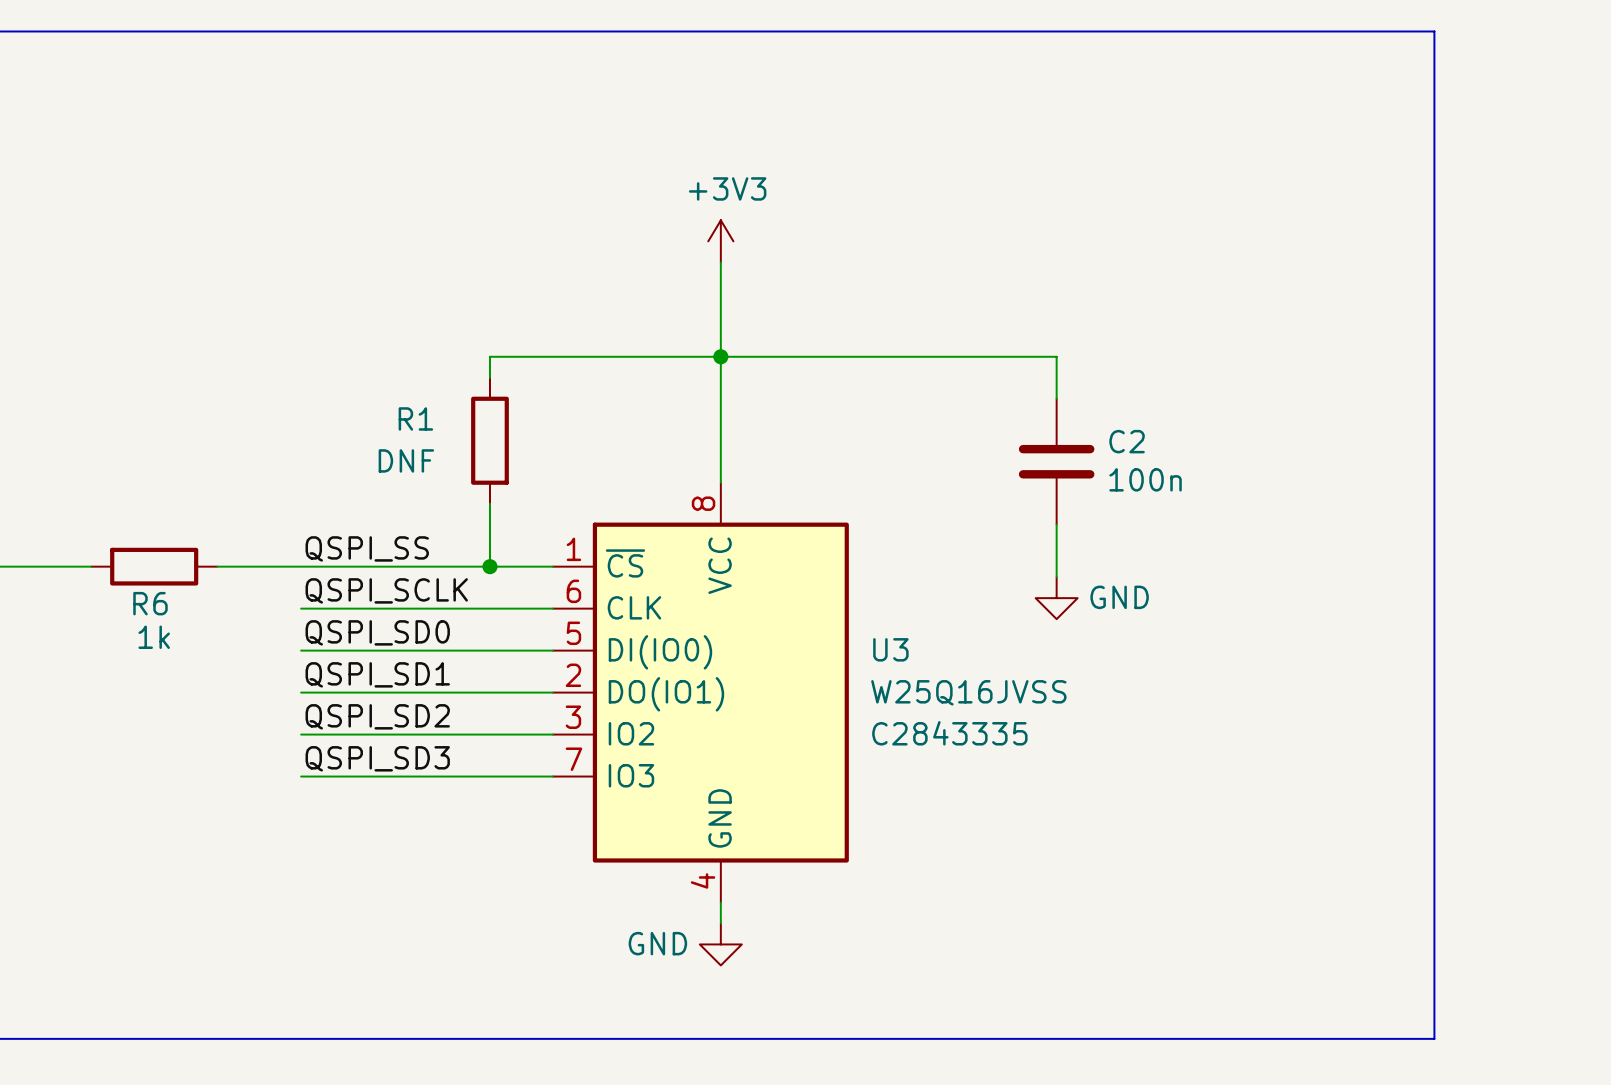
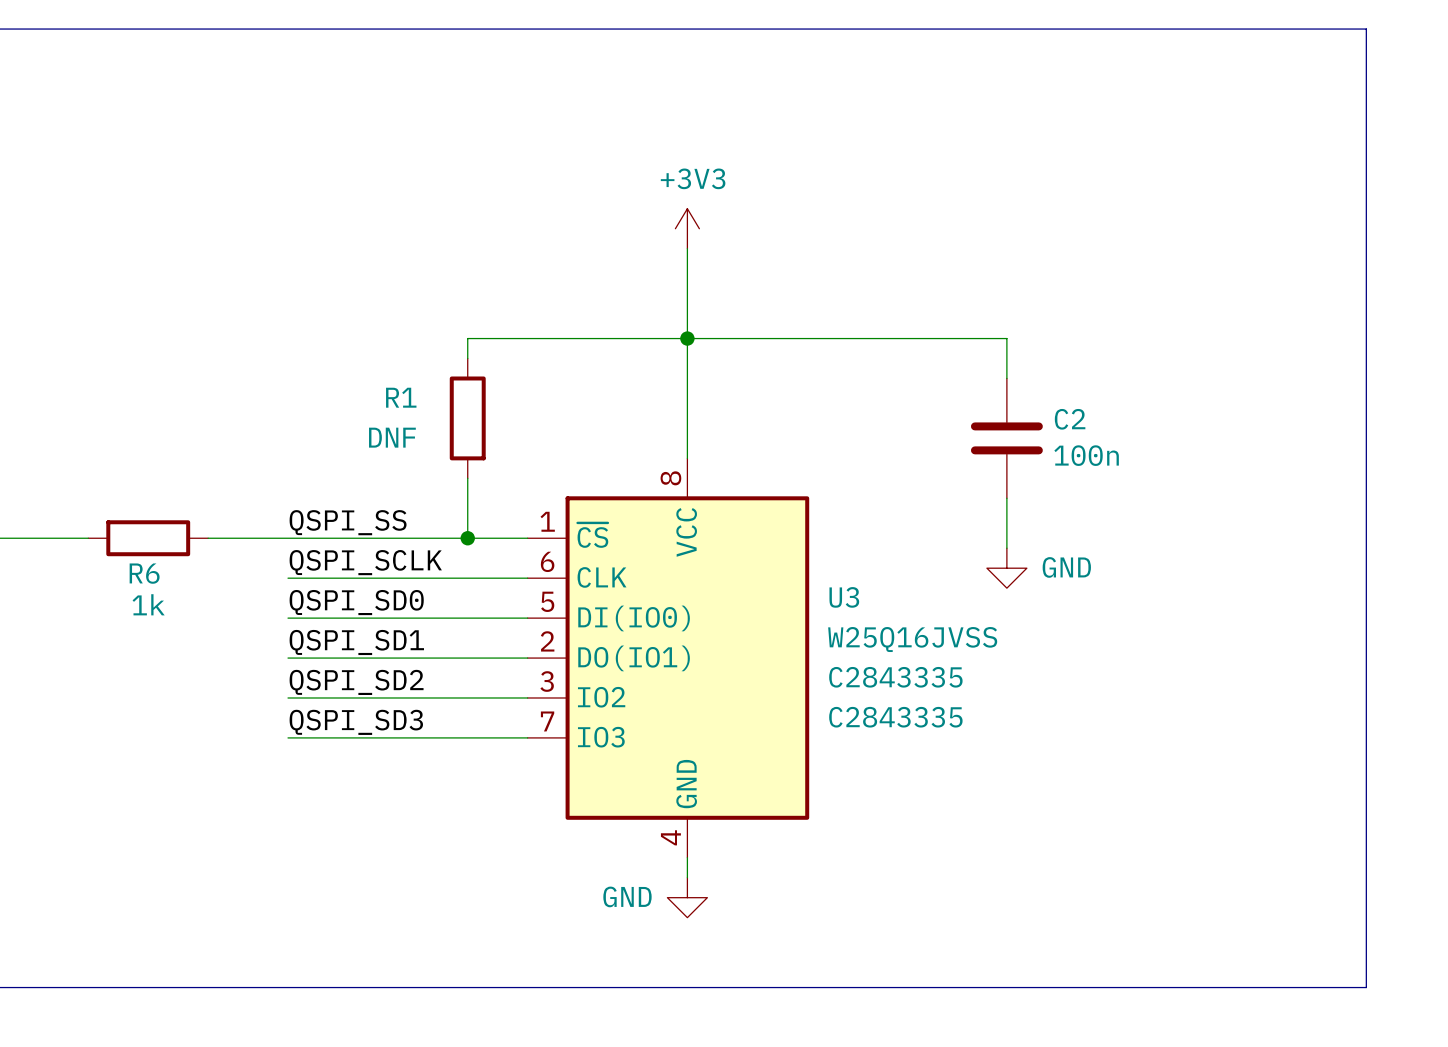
U3 name position: U3 (890, 649) -> U3 (844, 597)
U3 value position: W25Q16JVSS (968, 692) -> W25Q16JVSS (912, 639)
U3 text position: C2843335 (949, 733) -> C2843335 (895, 677)
U3 text: none -> C2843335 (895, 717)

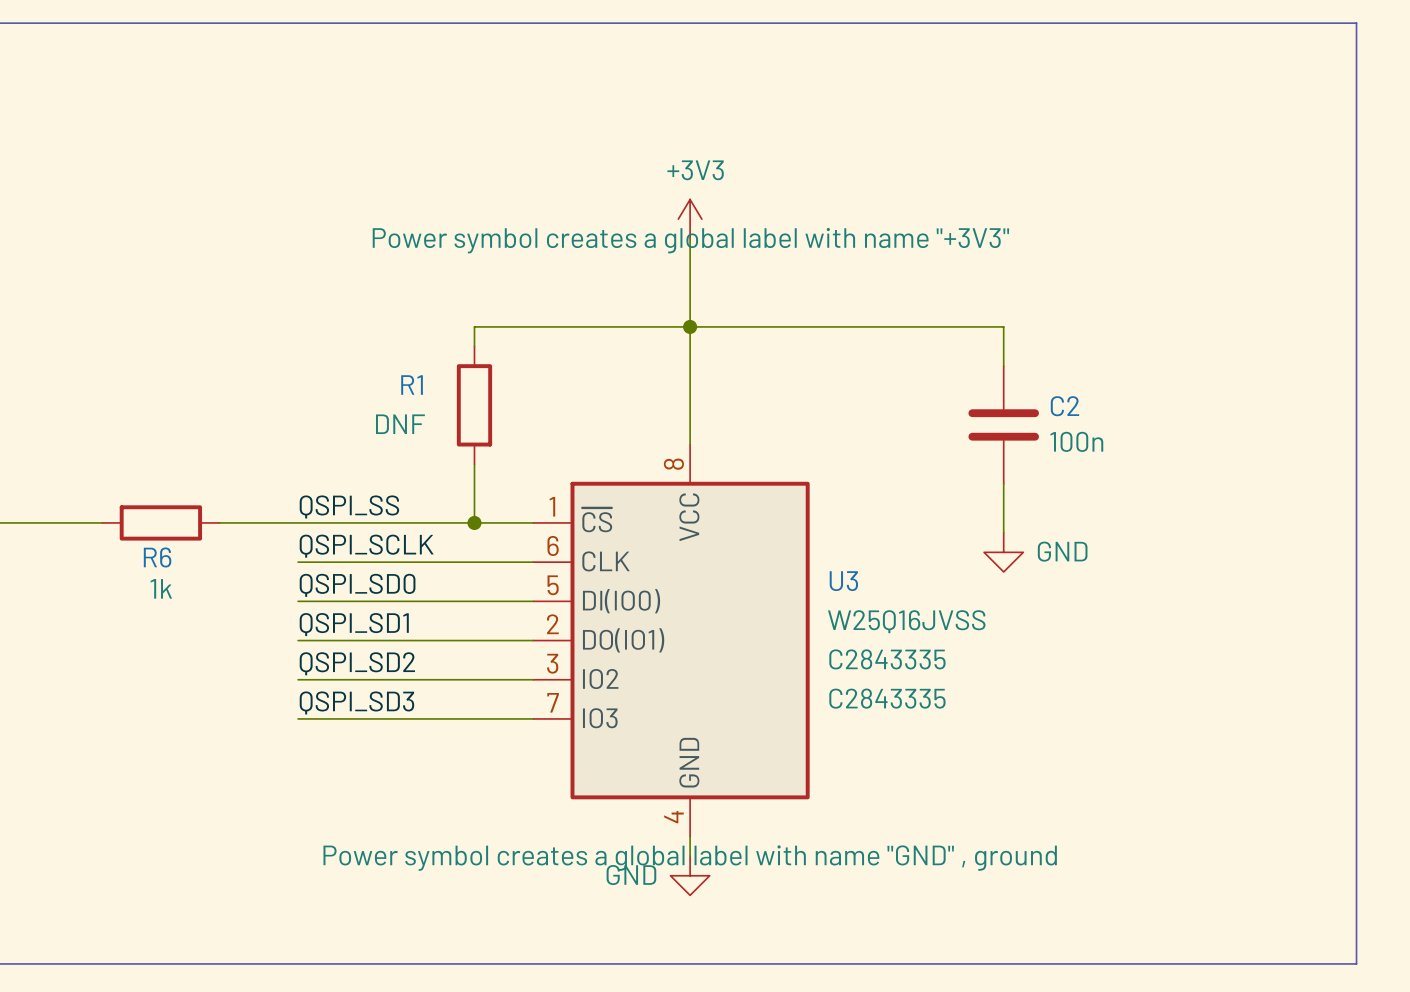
power symbol text: none -> Power symbol creates a global label with name "+3V3" (690, 240)
power symbol text: none -> Power symbol creates a global label with name "GND" , ground (690, 858)

